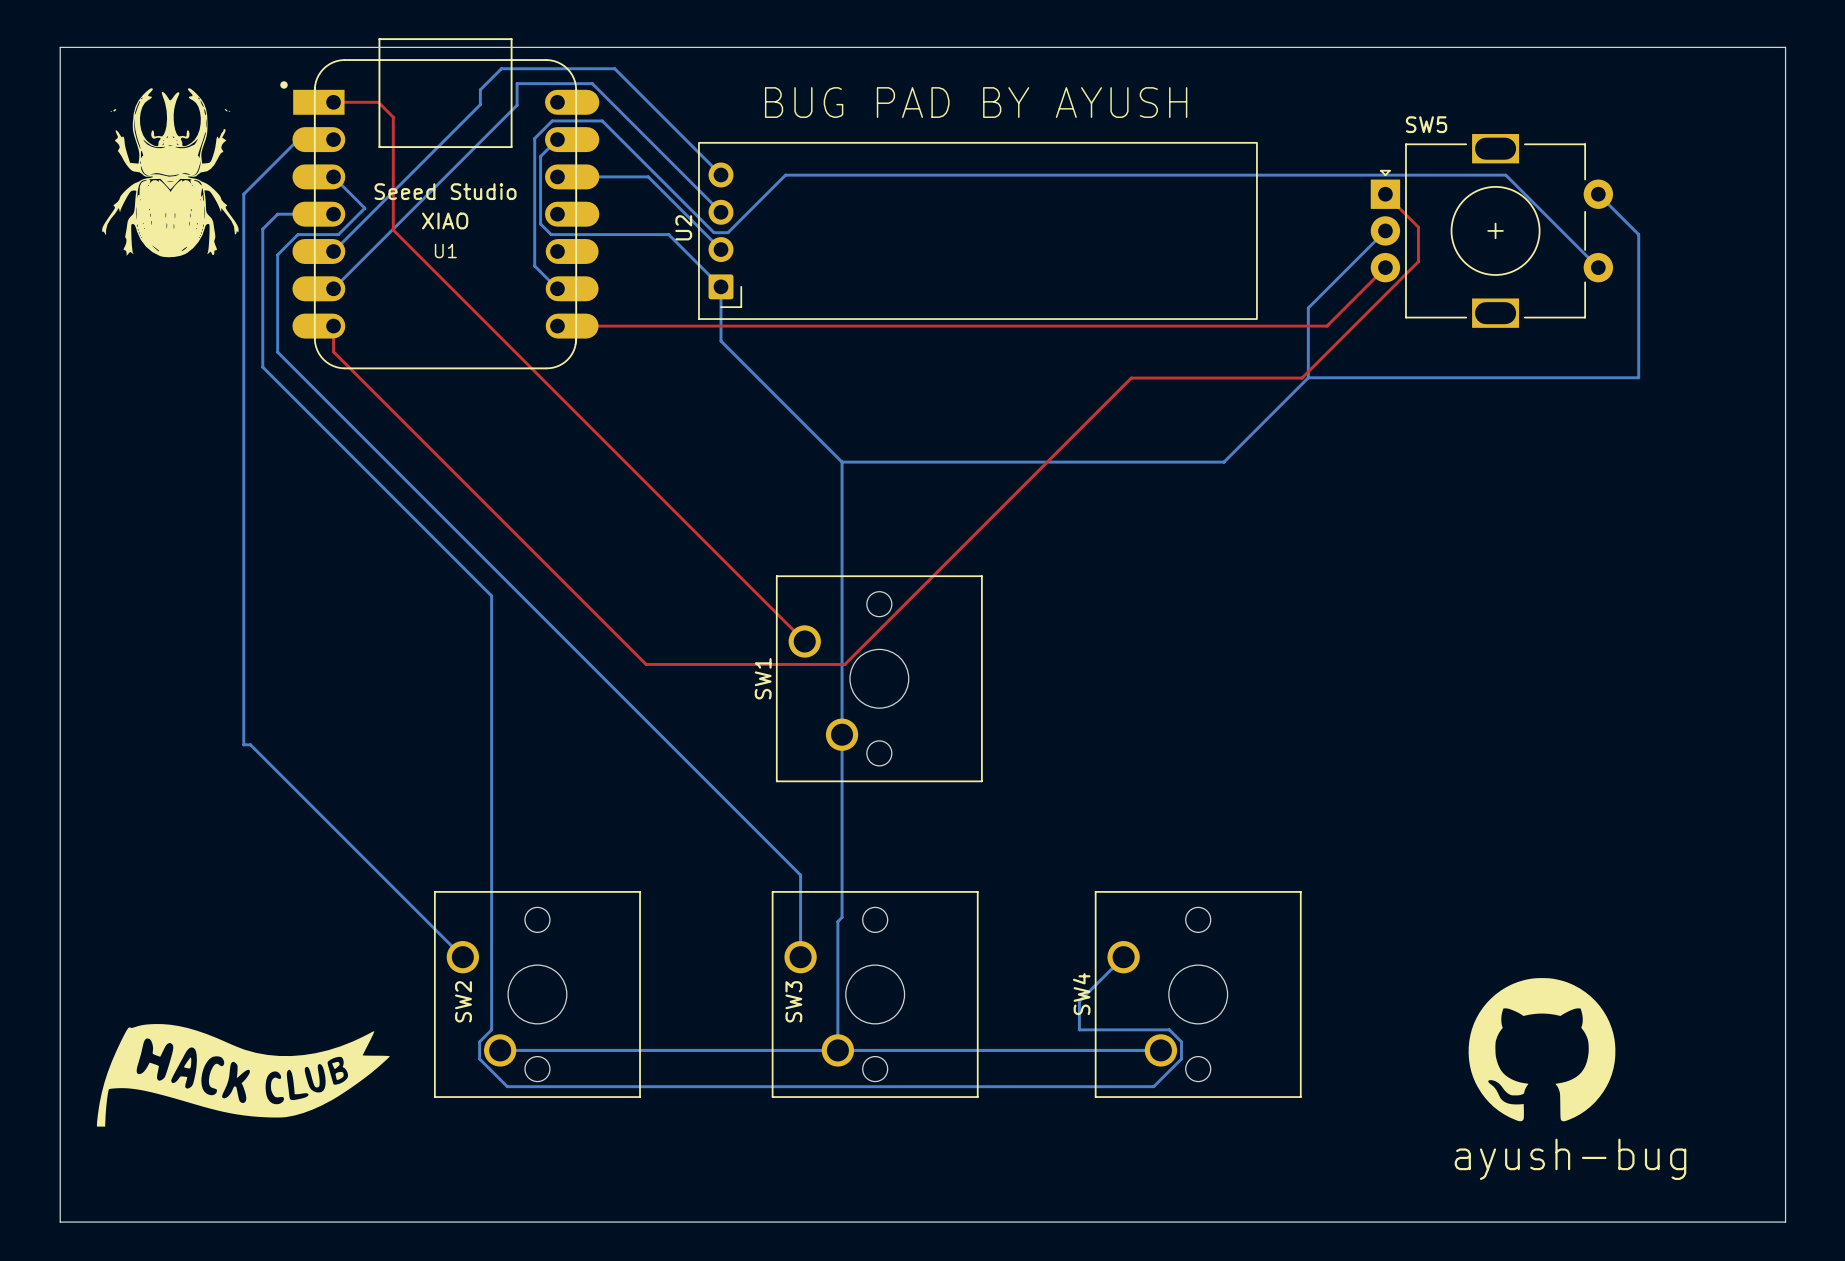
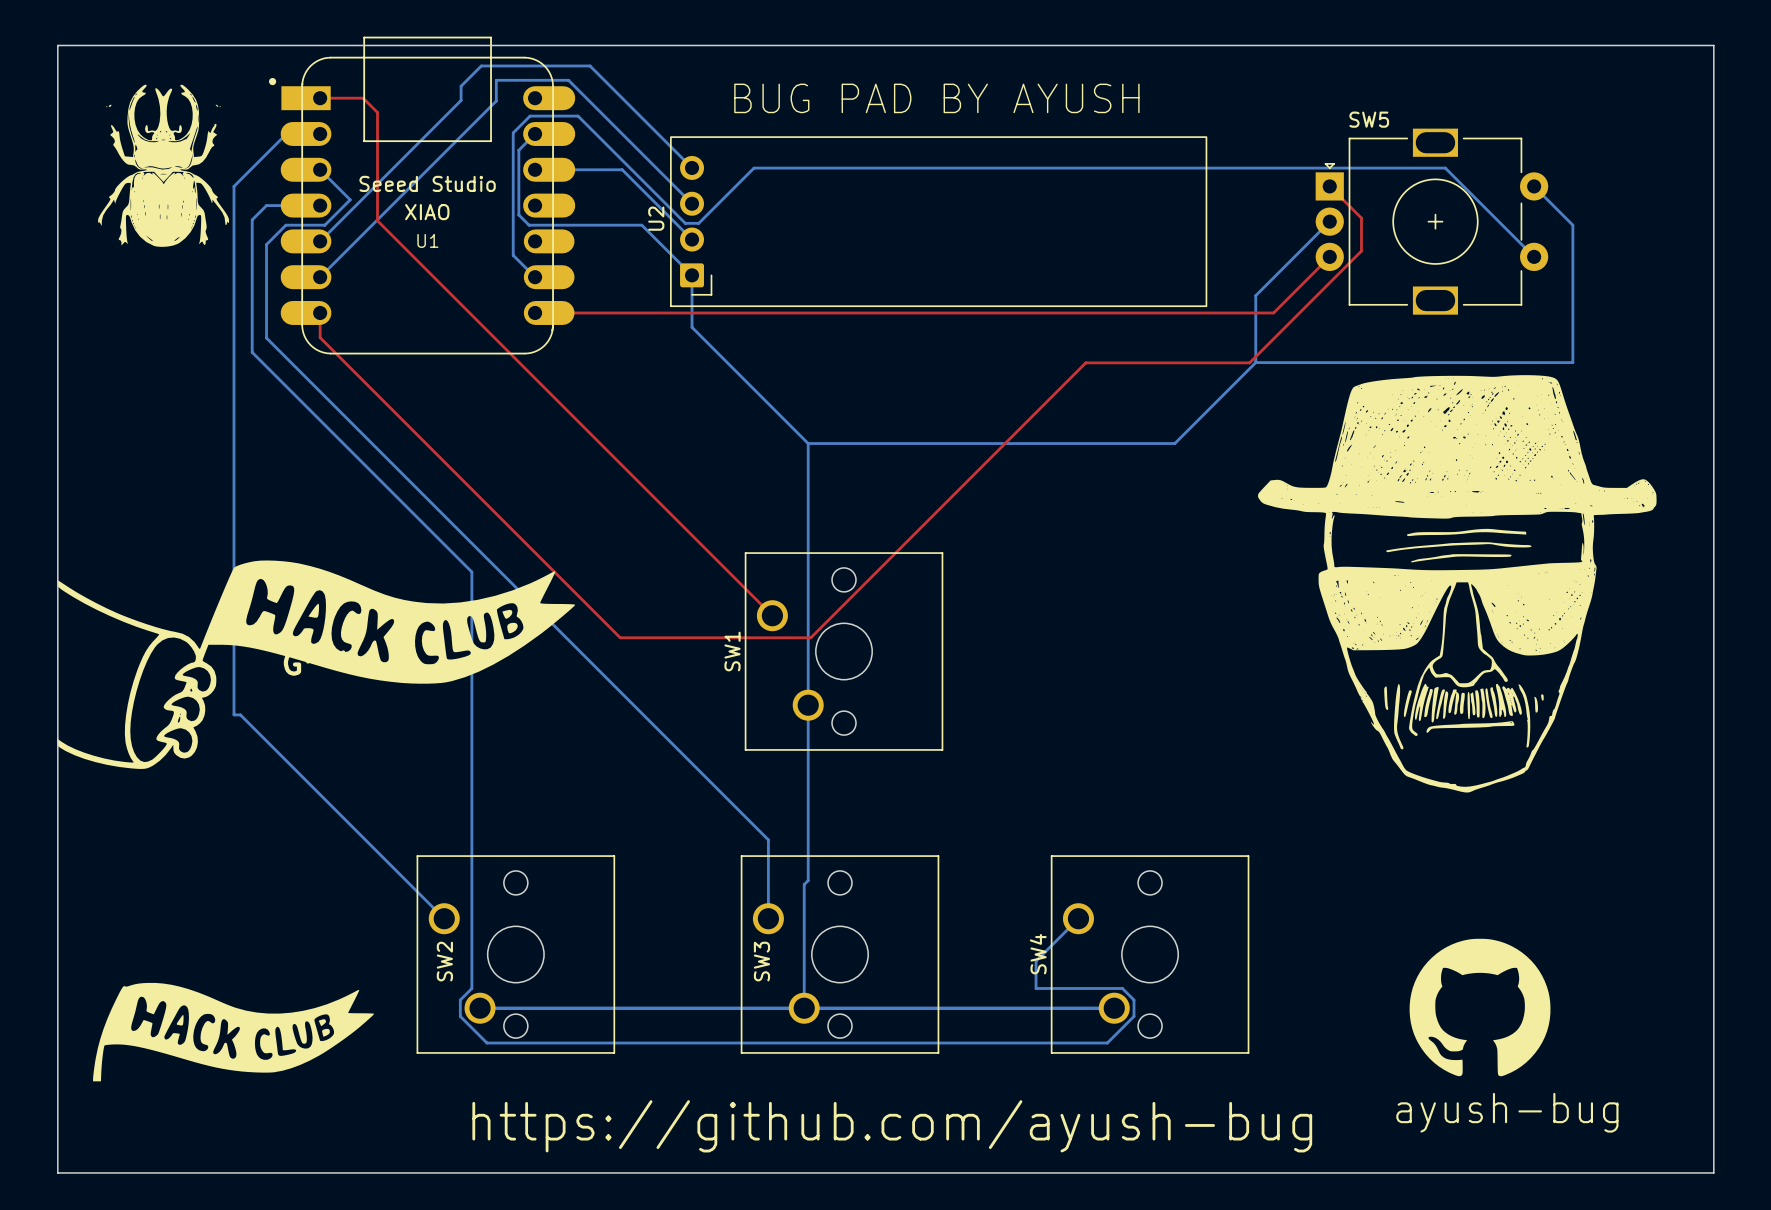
drawing: none -> [1257, 375, 1657, 793]
part: none -> (316, 664)
text: none -> https://github.com/ayush-bug (892, 1126)

